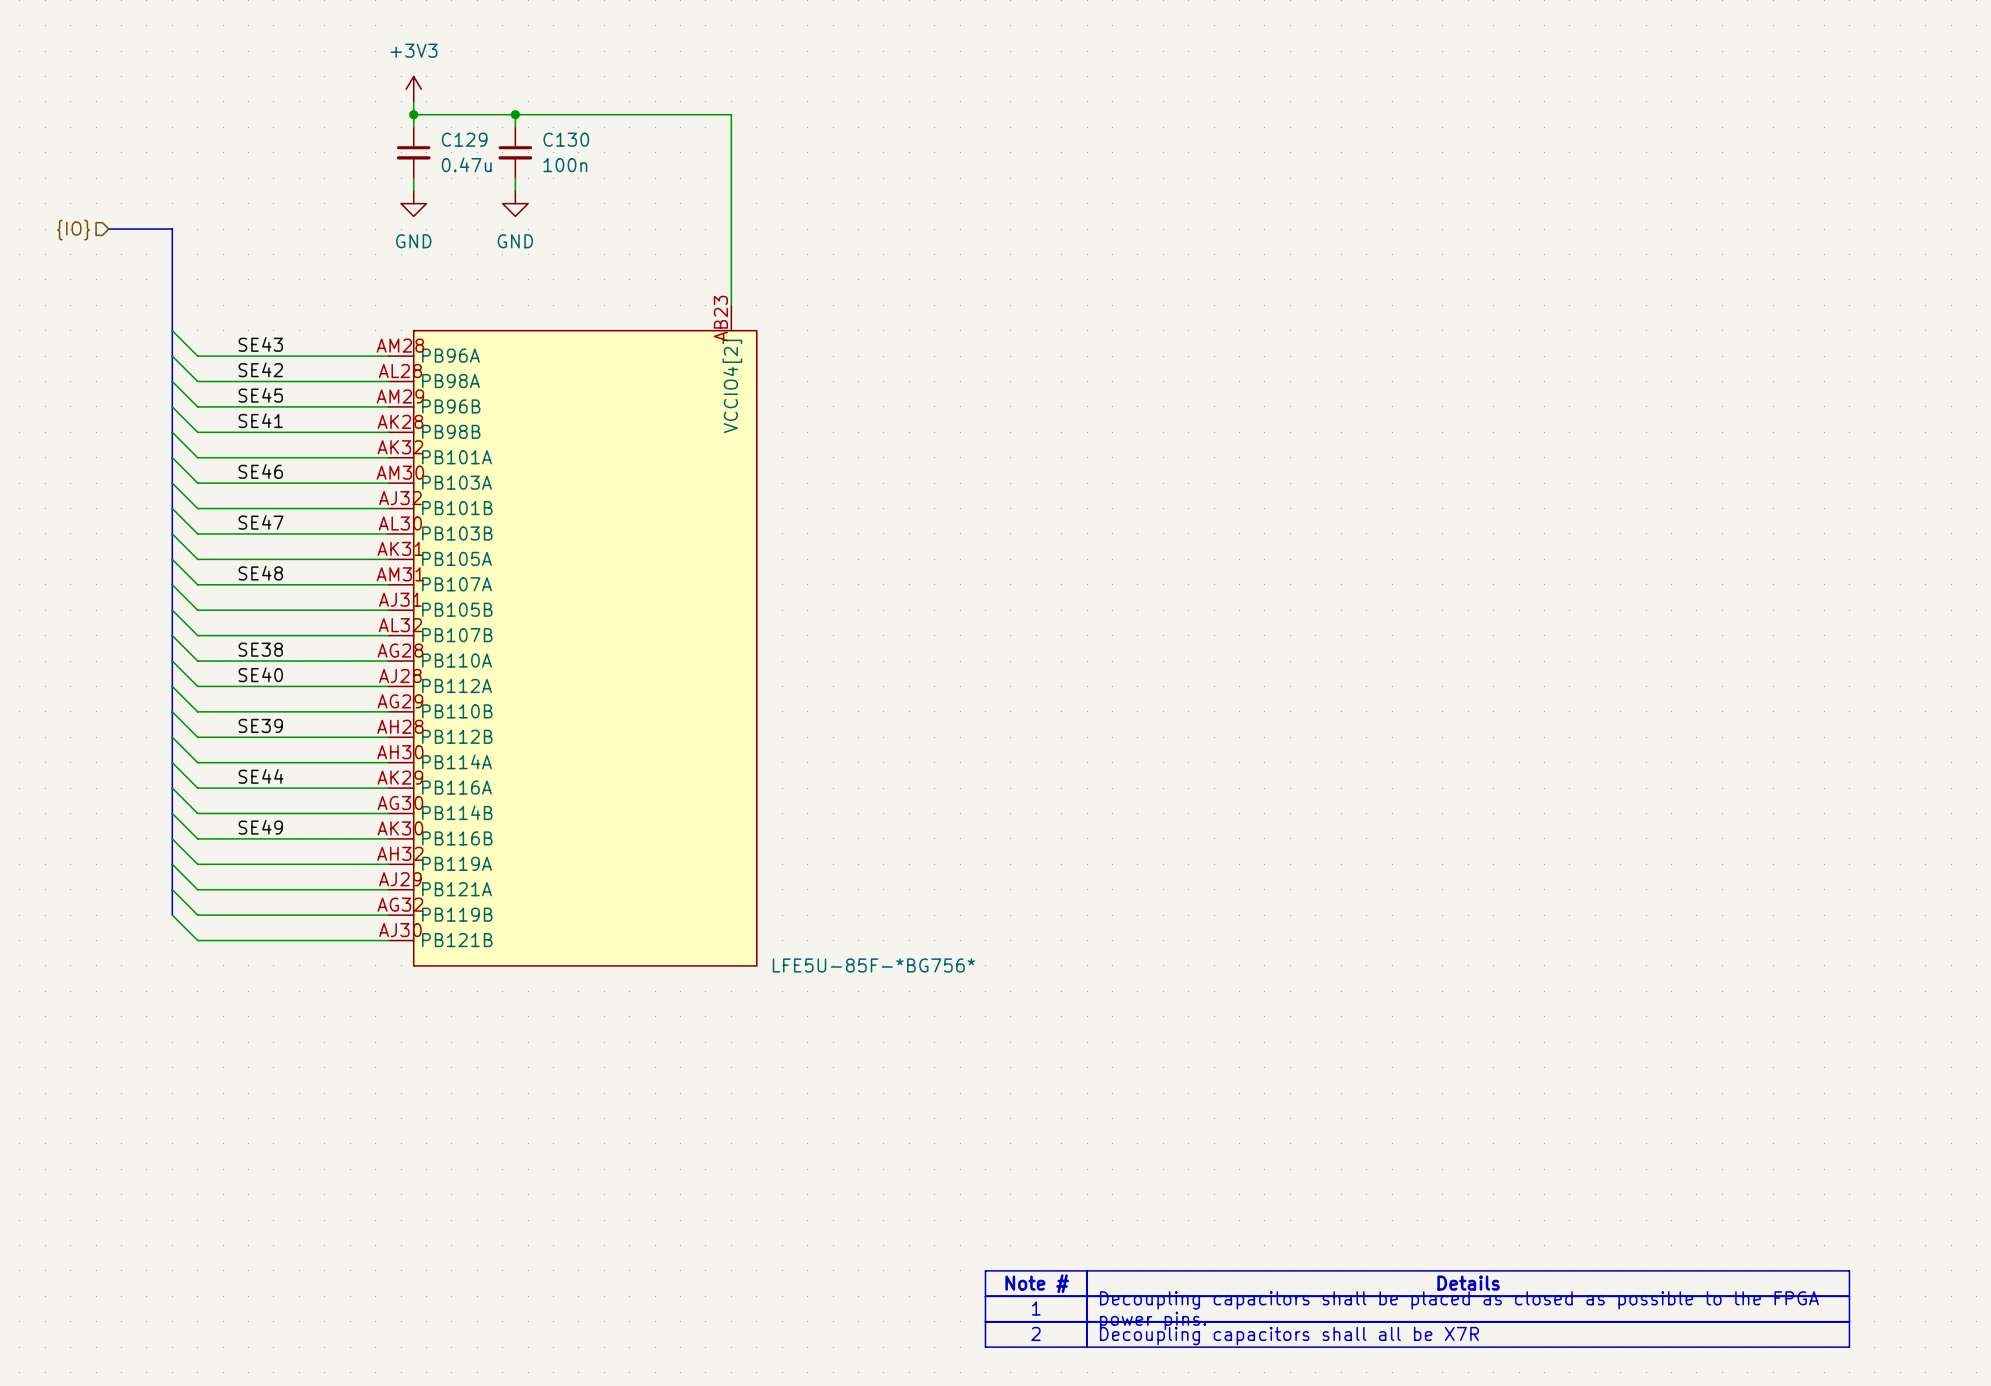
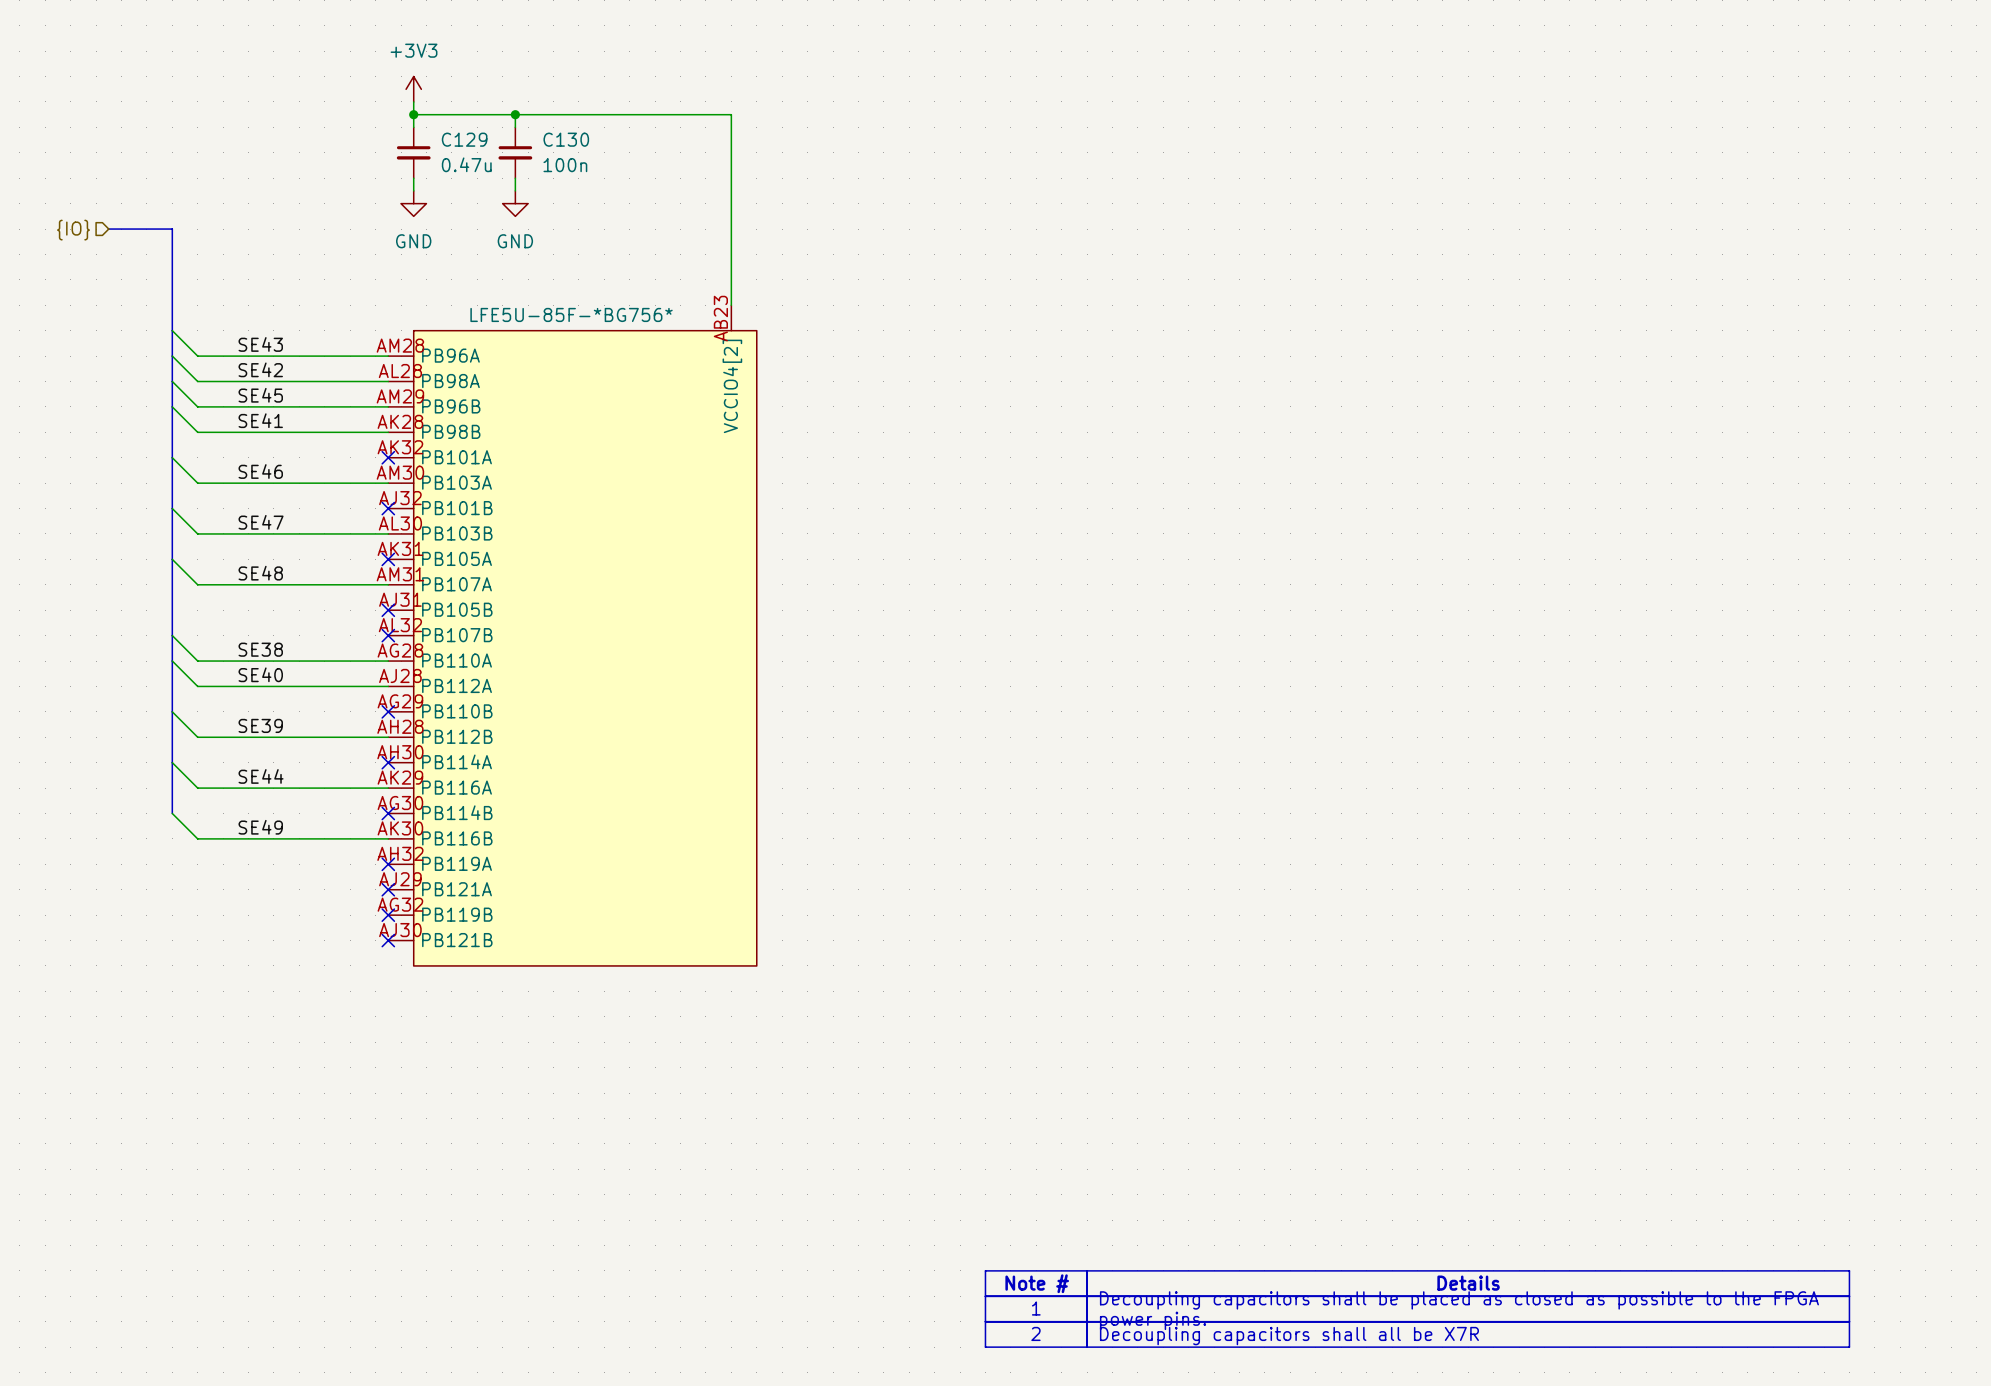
wire: (172, 432) (197, 457) (388, 457) -> none
no-connect mark: none -> (388, 457)
wire: (172, 483) (197, 508) (388, 508) -> none
no-connect mark: none -> (388, 508)
wire: (172, 533) (197, 559) (388, 559) -> none
no-connect mark: none -> (388, 559)
wire: (172, 584) (197, 610) (388, 610) -> none
wire: (172, 610) (197, 635) (388, 635) -> none
no-connect mark: none -> (388, 610)
no-connect mark: none -> (388, 635)
wire: (172, 686) (197, 711) (388, 711) -> none
no-connect mark: none -> (388, 711)
wire: (172, 737) (197, 762) (388, 762) -> none
no-connect mark: none -> (388, 762)
wire: (172, 788) (197, 813) (388, 813) -> none
bus: (172, 813) (172, 915) -> none
no-connect mark: none -> (388, 813)
wire: (172, 838) (197, 864) (388, 864) -> none
wire: (172, 864) (197, 889) (388, 889) -> none
no-connect mark: none -> (388, 864)
wire: (172, 889) (197, 915) (388, 915) -> none
no-connect mark: none -> (388, 889)
wire: (172, 915) (197, 940) (388, 940) -> none
no-connect mark: none -> (388, 915)
no-connect mark: none -> (388, 940)
part value position: LFE5U-85F-*BG756* (873, 965) -> LFE5U-85F-*BG756* (571, 314)

